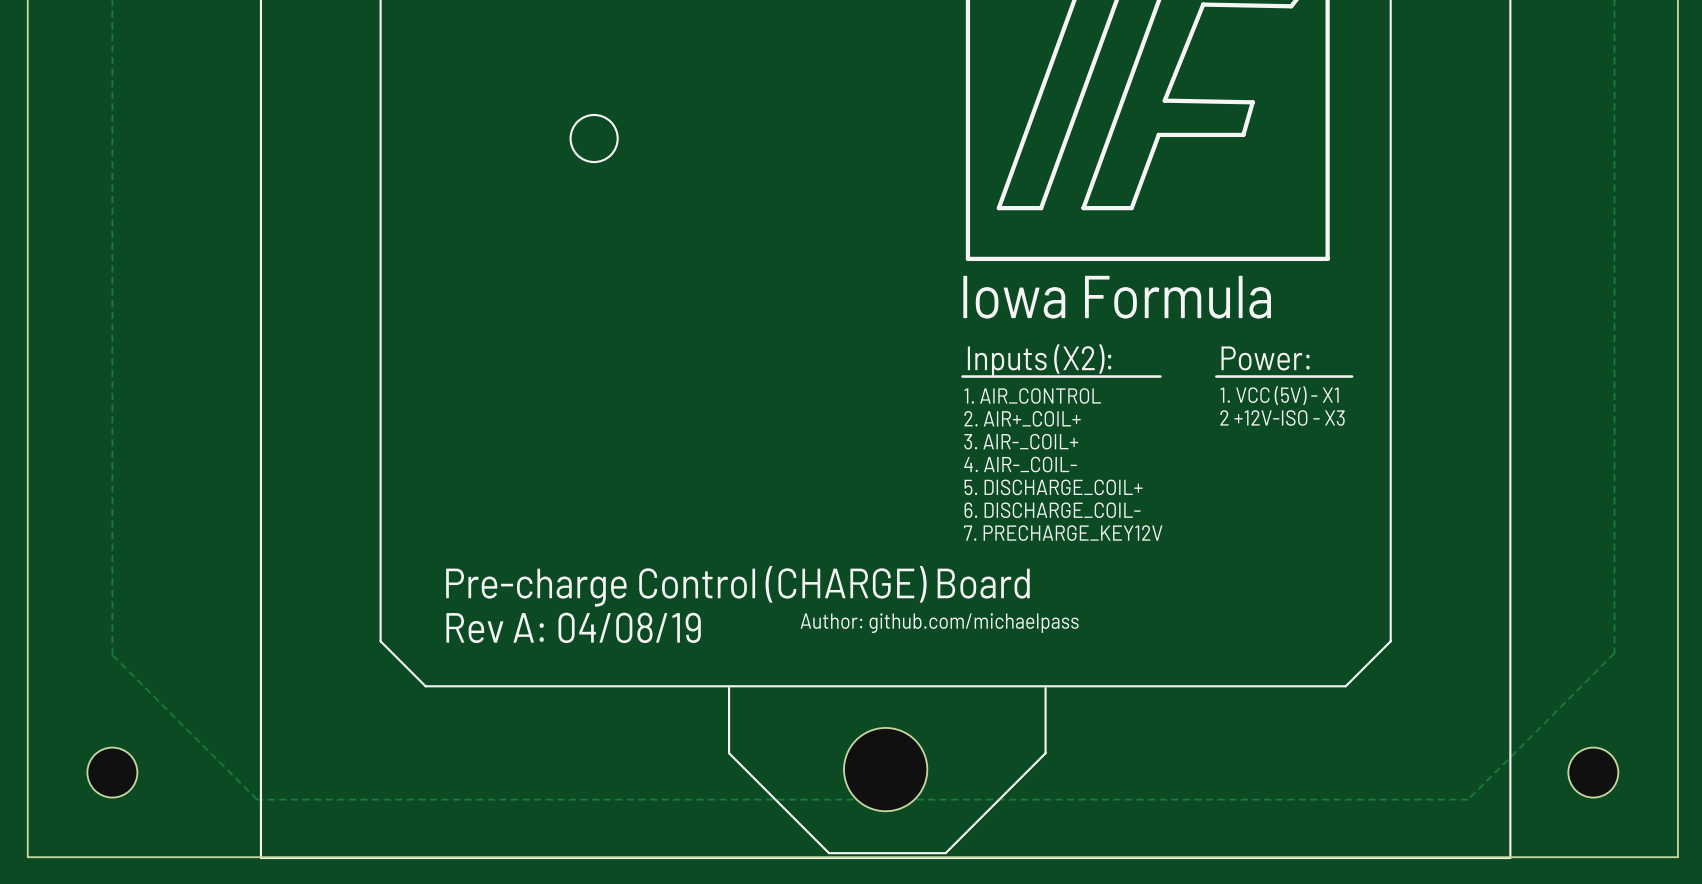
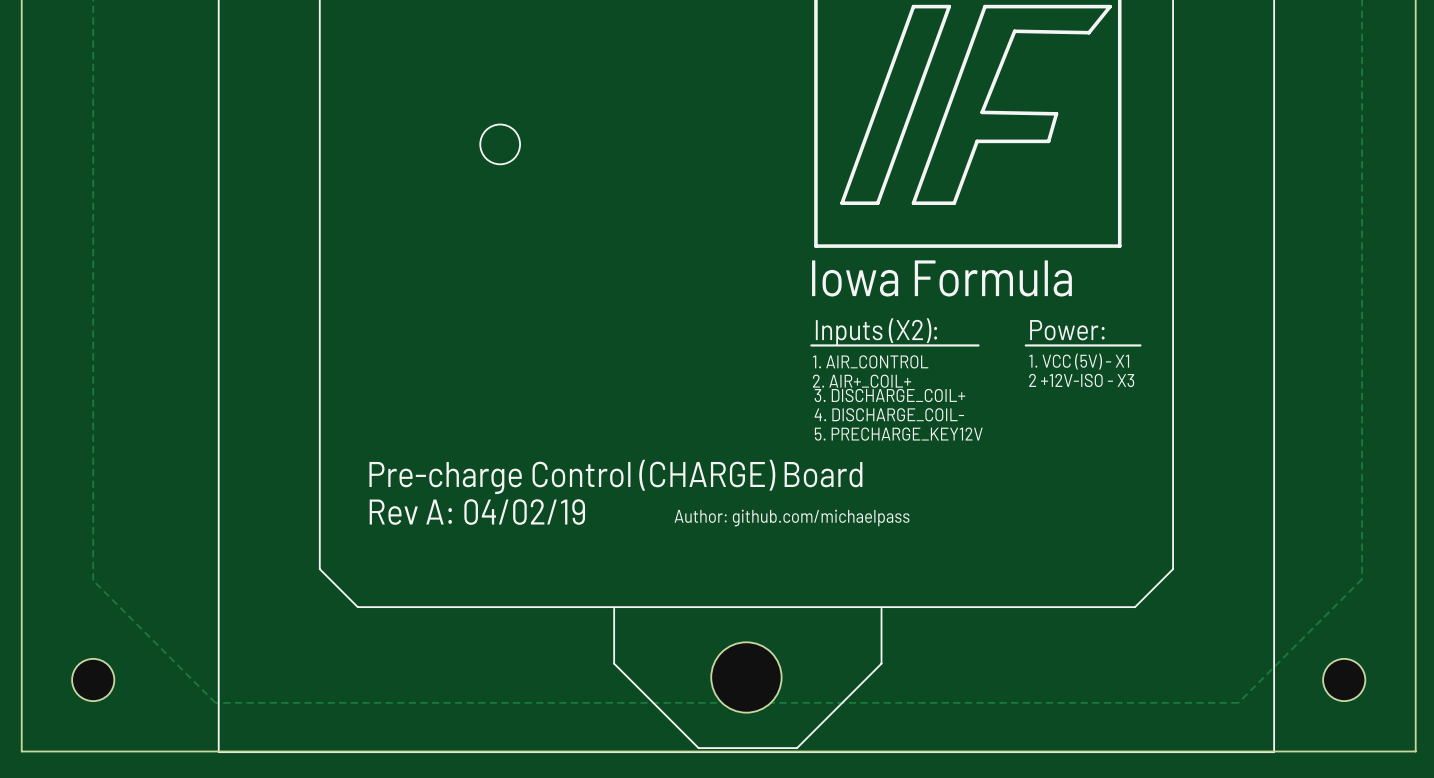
text: 3. AIR-_COIL+ (1021, 441) -> 3. DISCHARGE_COIL+ (889, 395)
text: 4. AIR-_COIL- (1020, 464) -> 4. DISCHARGE_COIL- (889, 414)
text: 5. DISCHARGE_COIL+ (1053, 487) -> 5. PRECHARGE_KEY12V (898, 434)
text: 6. DISCHARGE_COIL- (1052, 510) -> none
text: 7. PRECHARGE_KEY12V (1063, 533) -> none
text position: Pre-charge Control (CHARGE) Board (737, 586) -> Pre-charge Control (CHARGE) Board (615, 476)
text position: Author: github.com/michaelpass (939, 623) -> Author: github.com/michaelpass (792, 518)
text: Rev A: 04/08/19 (573, 627) -> Rev A: 04/02/19 (477, 512)

